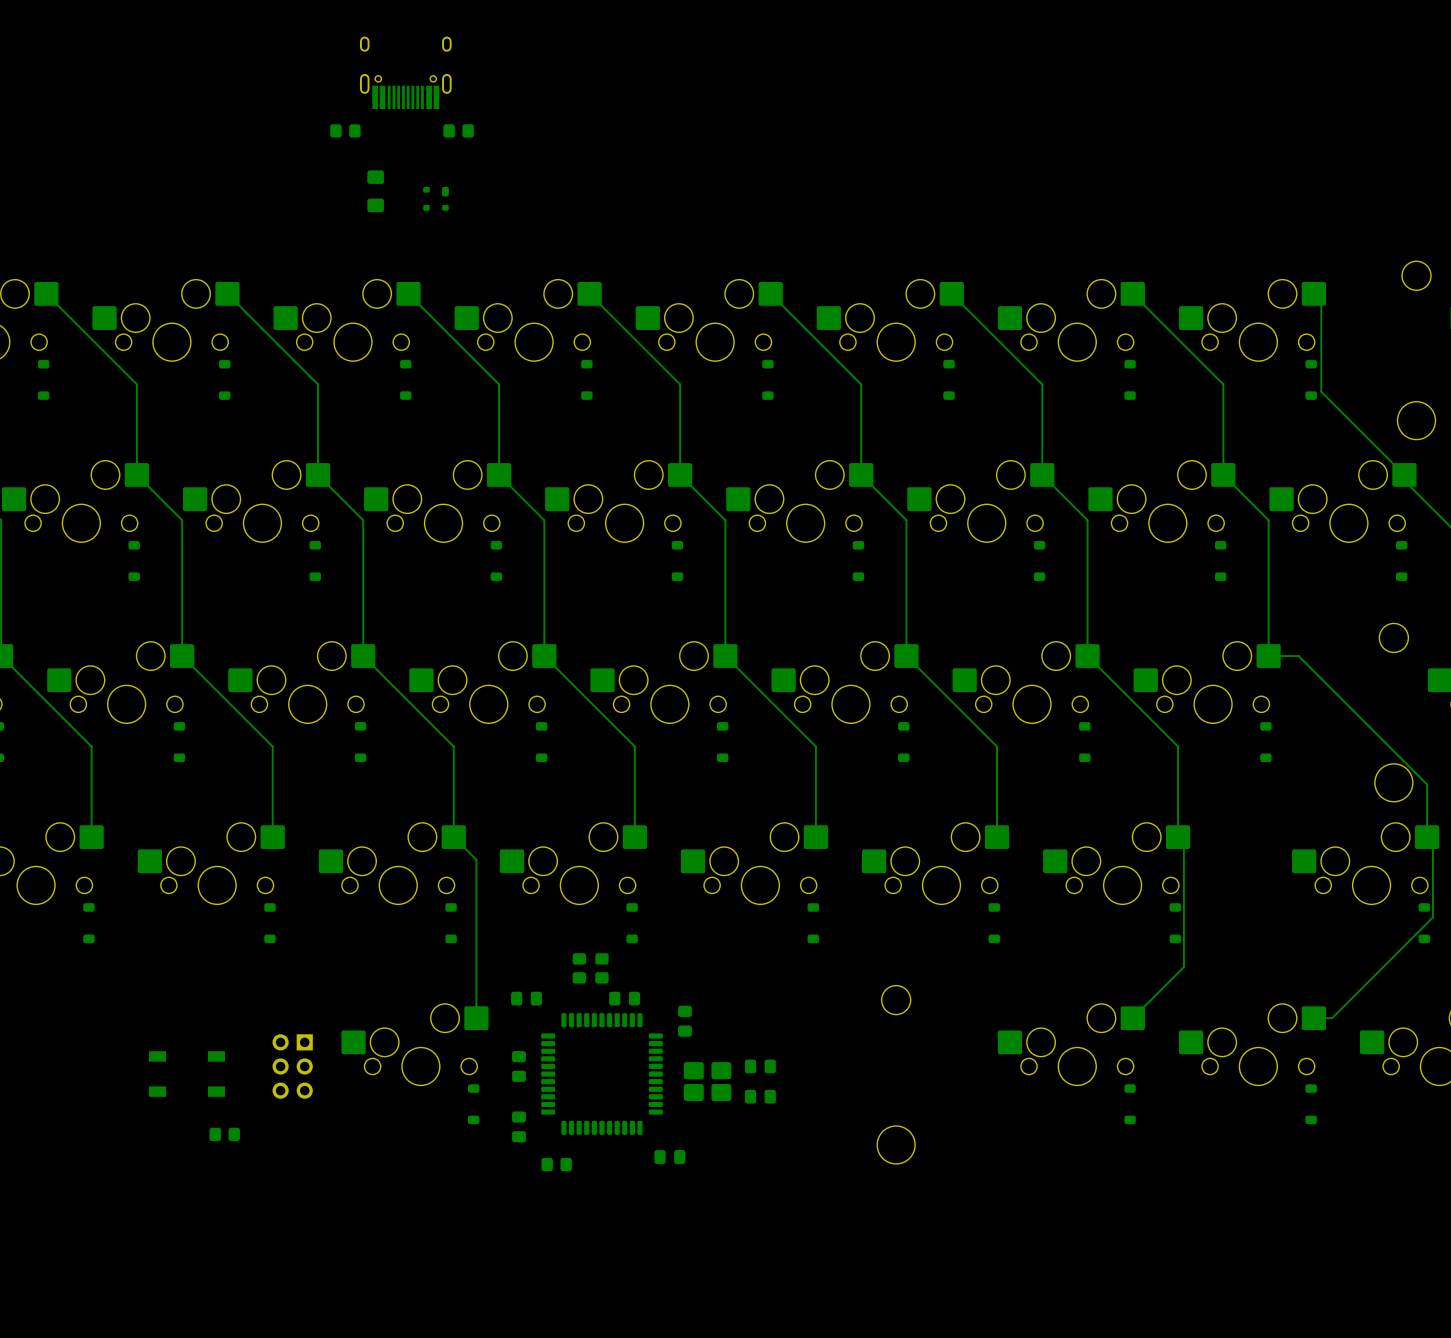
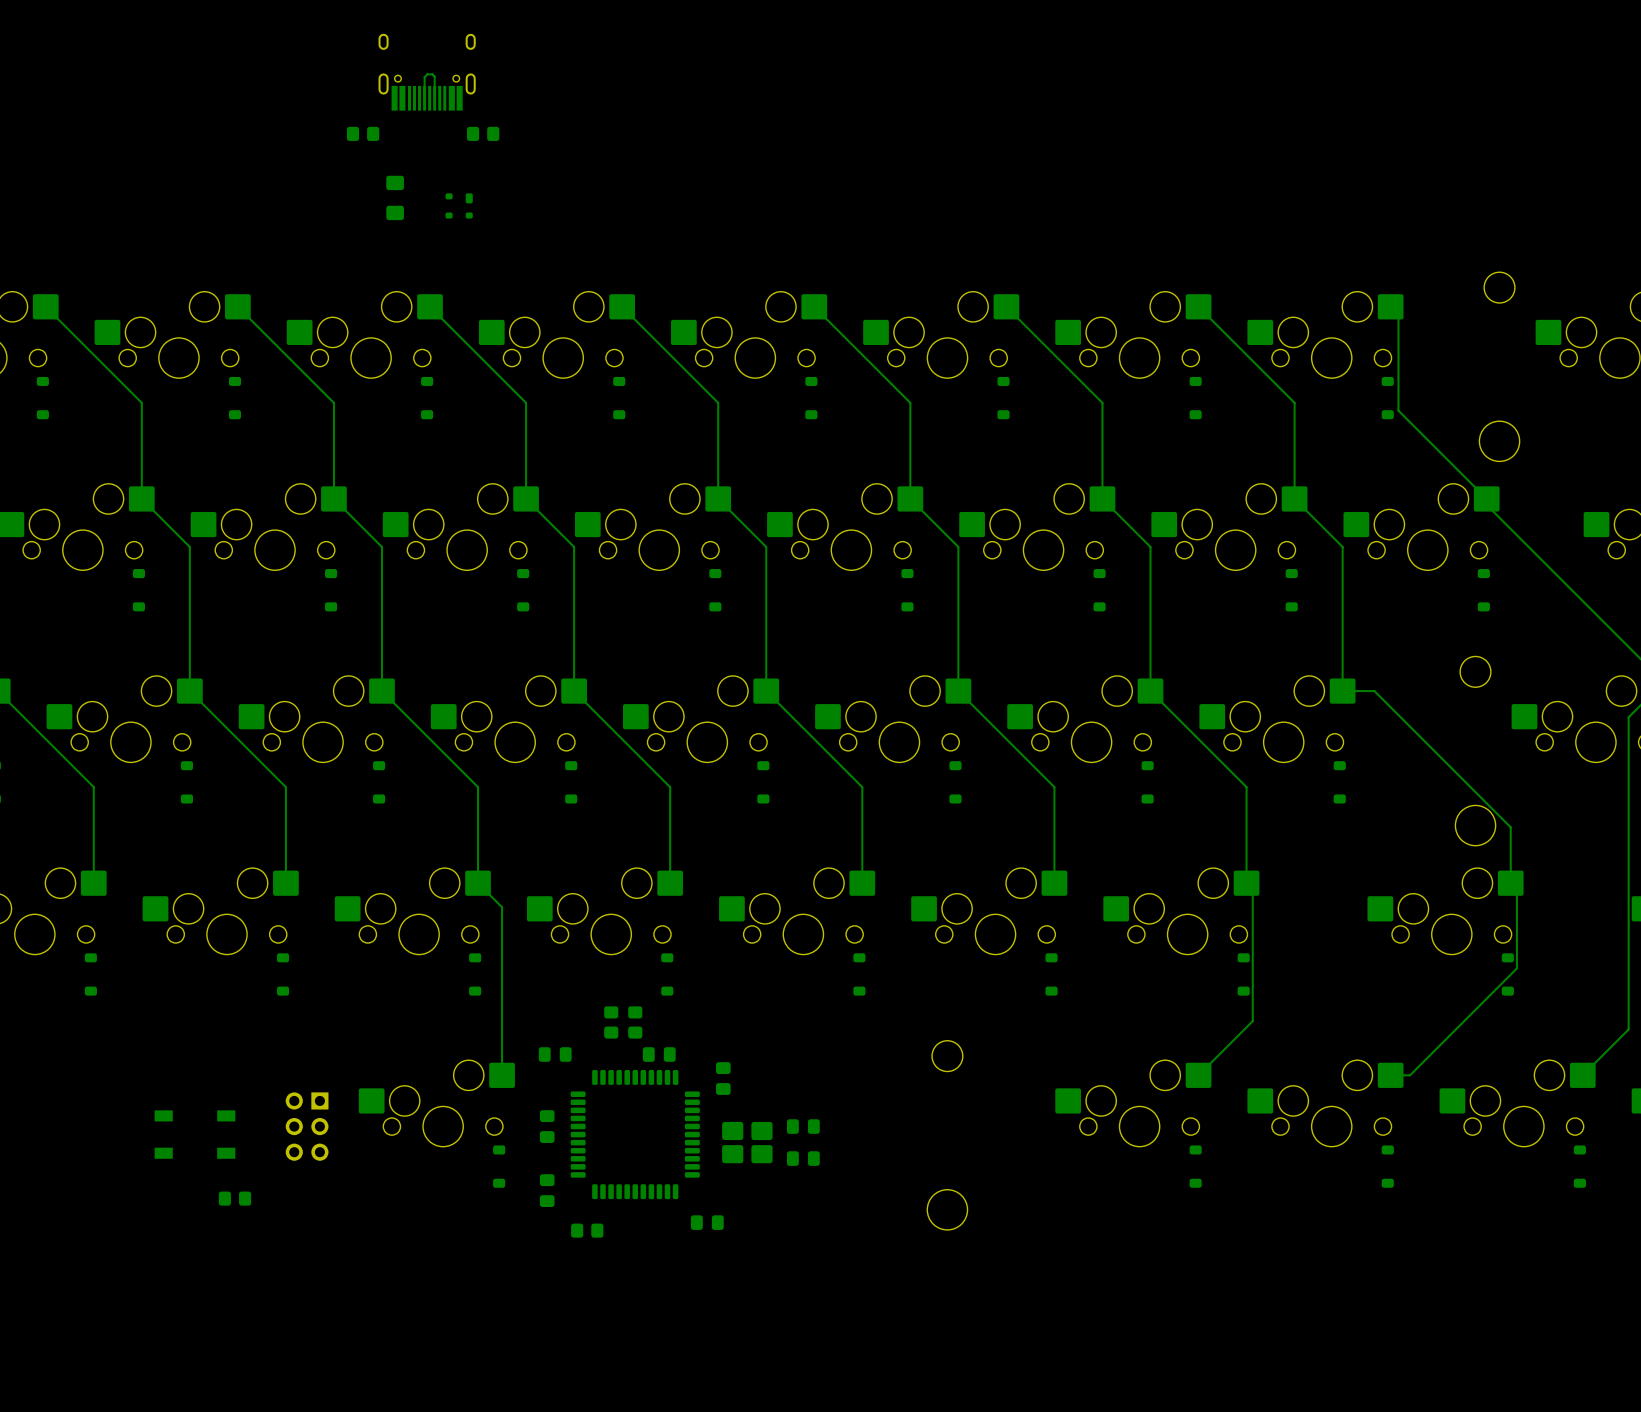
bottom track: none -> (424, 98) (424, 77) (427, 74) (434, 76) (434, 98)

